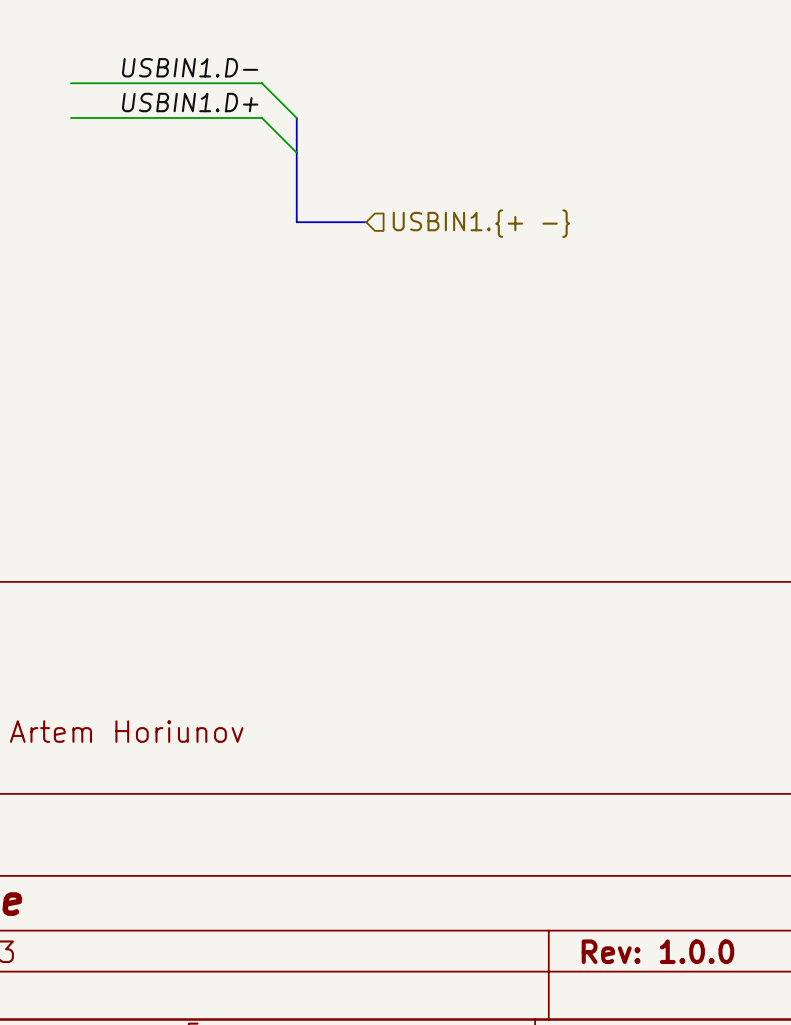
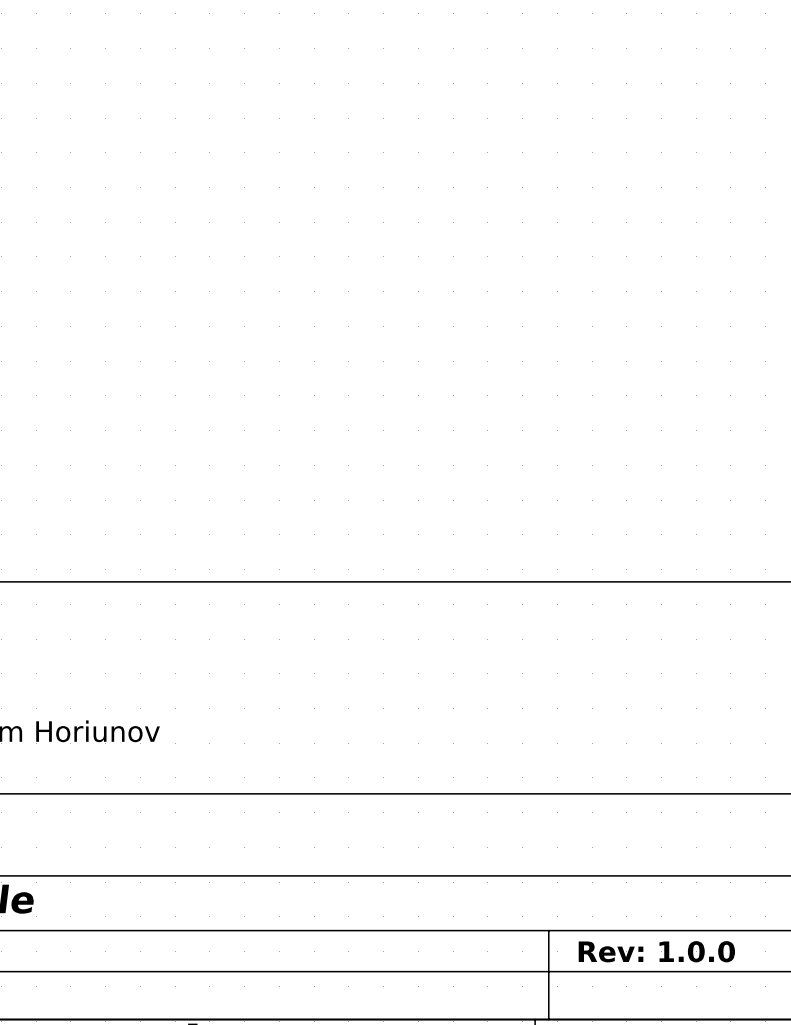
label: USBIN1.D- (190, 67) -> none
wire: (70, 83) (262, 83) (296, 118) -> none
label: USBIN1.D+ (190, 102) -> none
wire: (70, 118) (262, 118) (296, 152) -> none
bus: (296, 118) (296, 222) (366, 222) -> none
hierarchical label: USBIN1.{+ -} (481, 223) -> none

